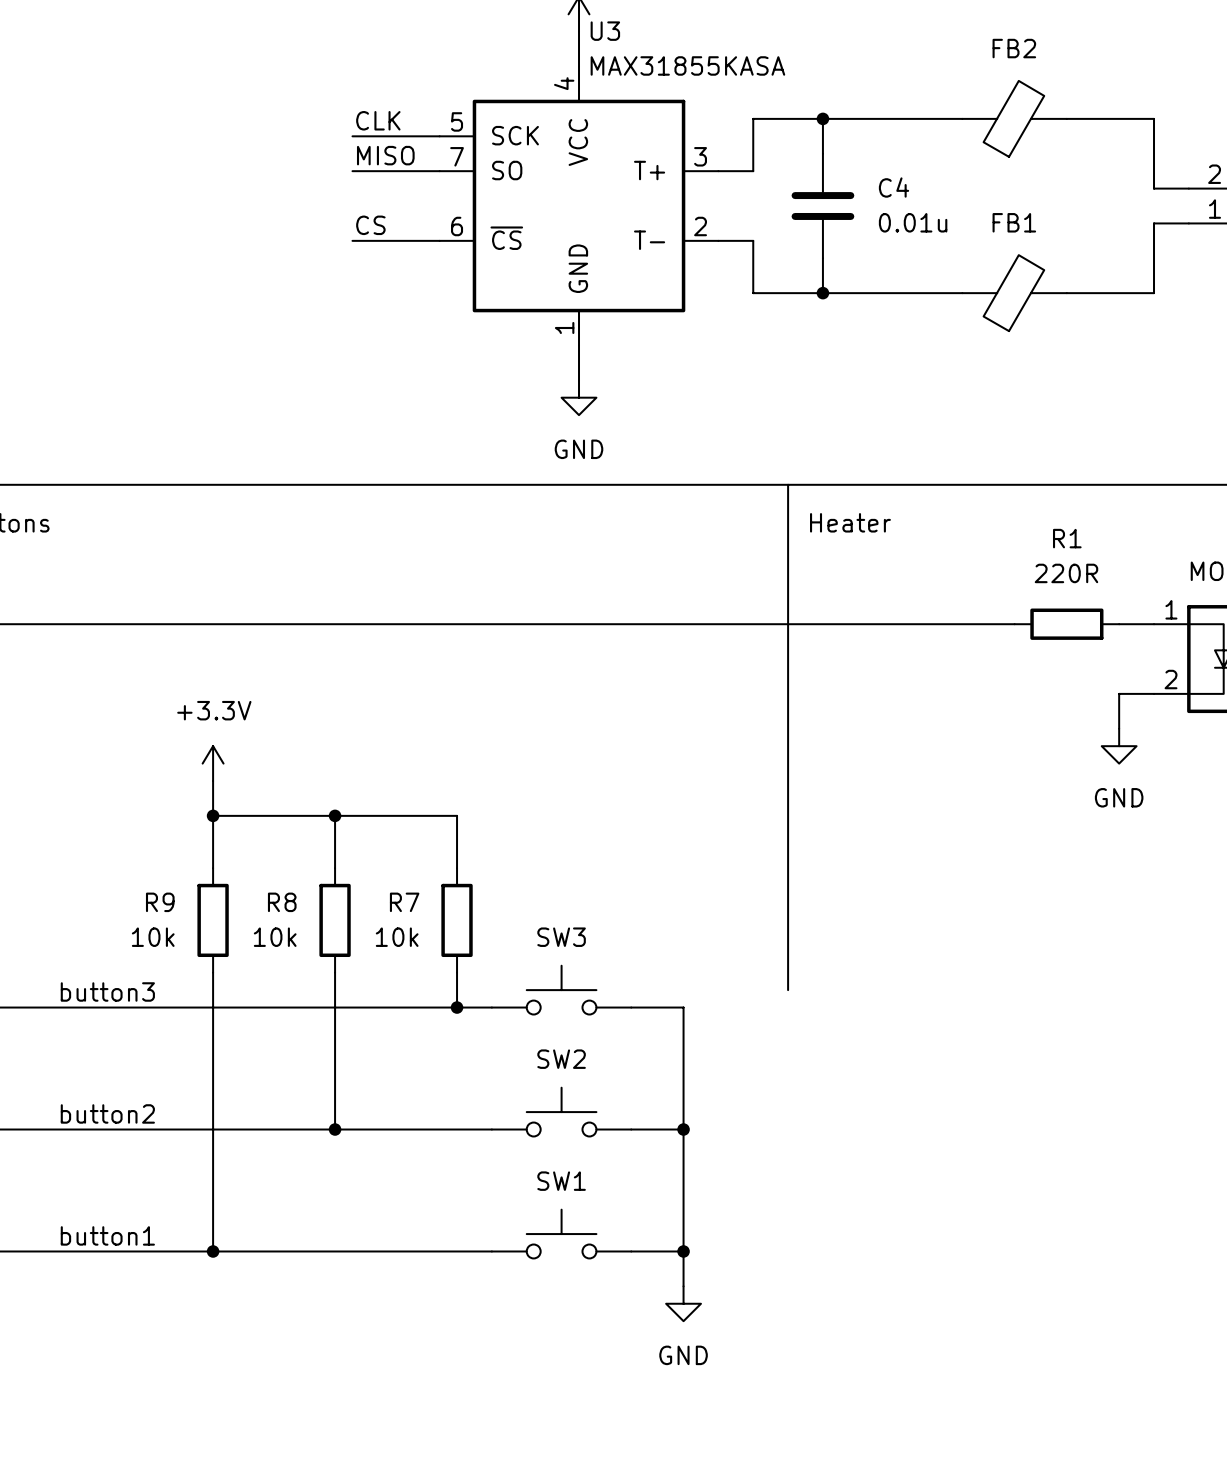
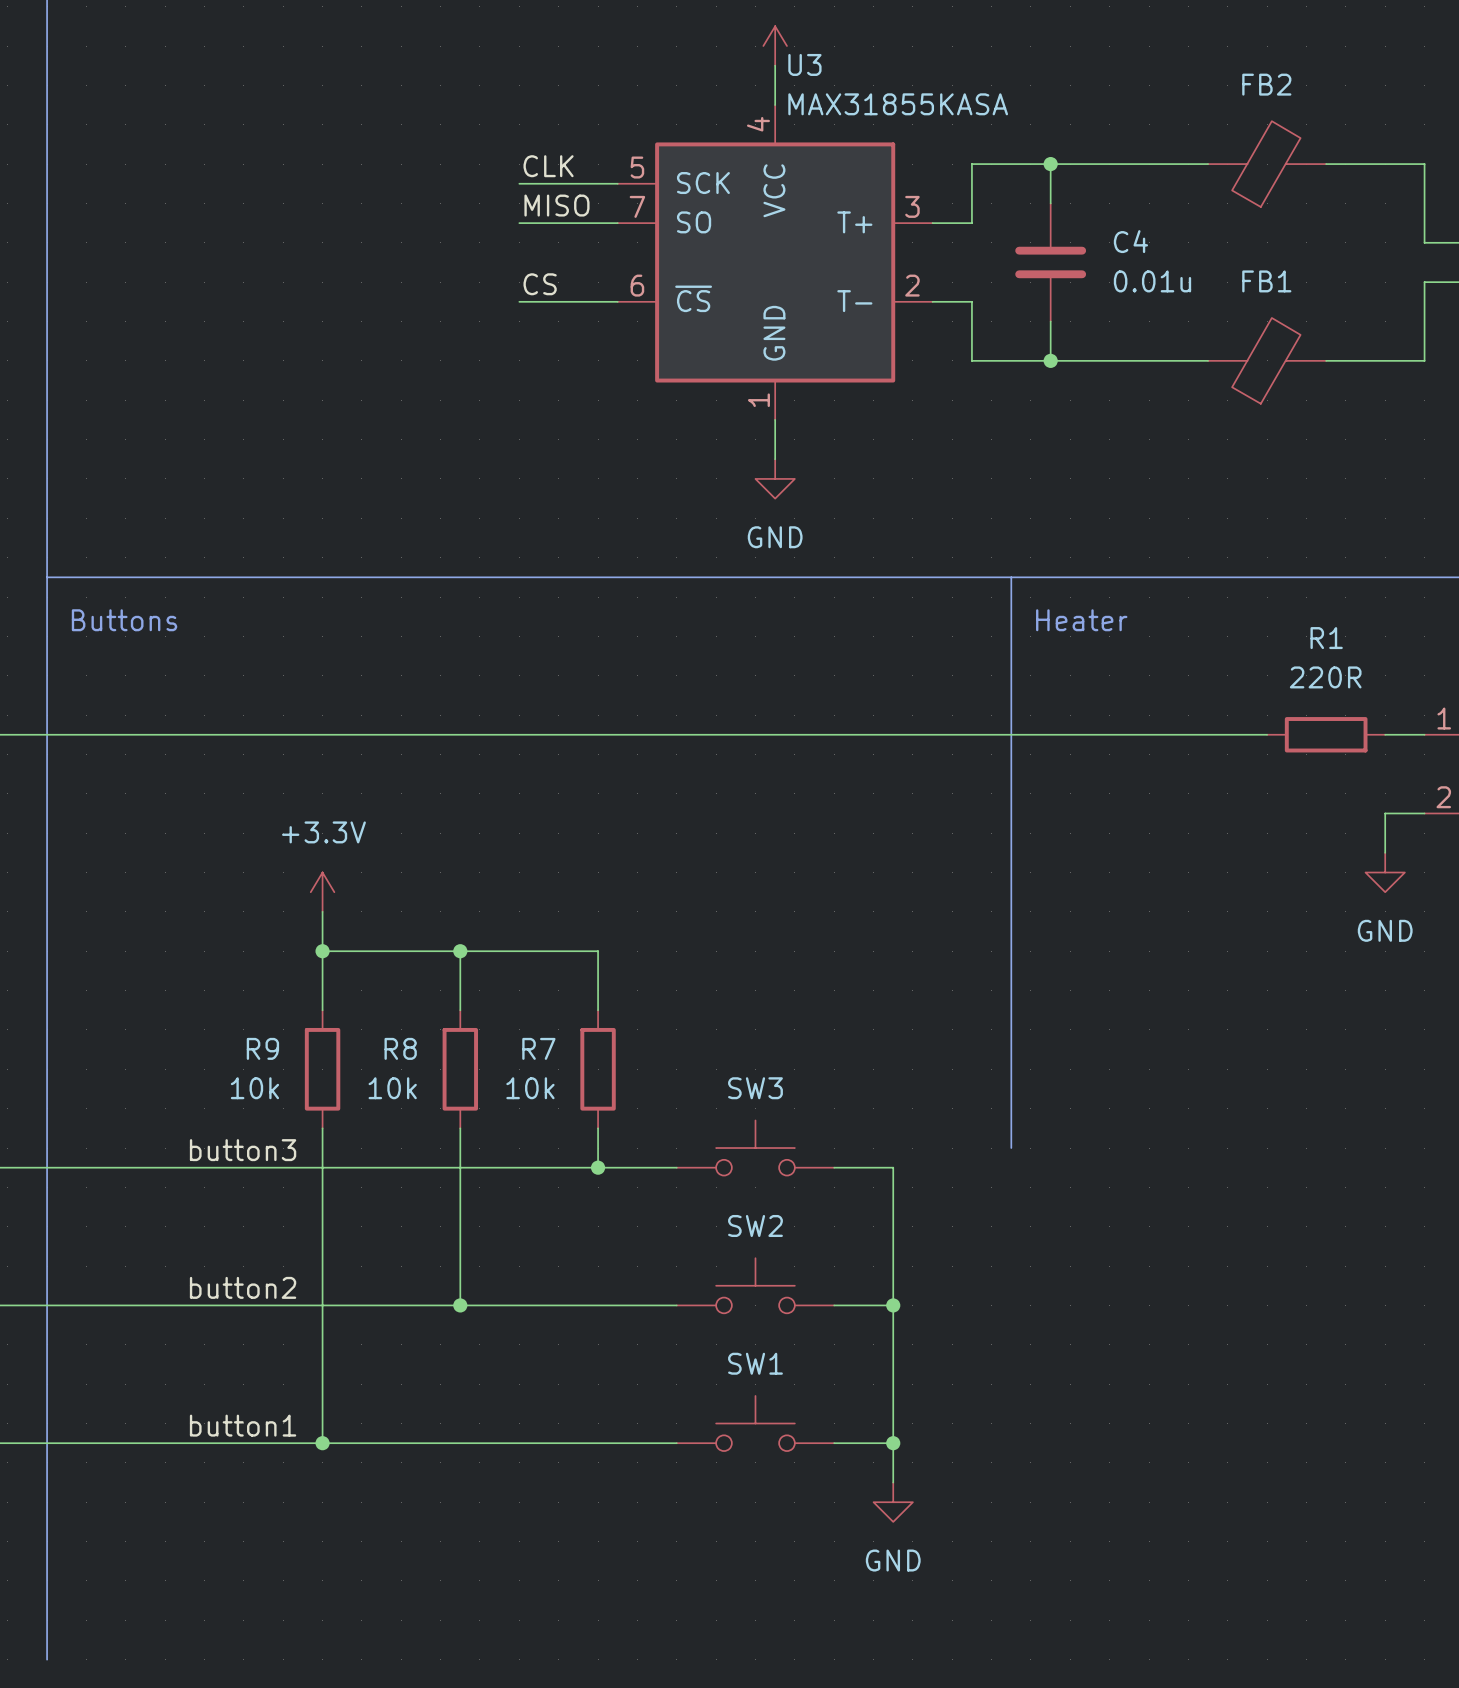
power symbol position: +3.3V (213, 763) -> +3.3V (322, 892)
wire: (213, 781) (213, 868) -> (322, 911) (322, 1010)
wire: none -> (322, 951) (361, 951)
junction position: (213, 815) -> (322, 951)
wire: (335, 815) (335, 868) -> (460, 951) (460, 1010)
junction position: (335, 815) -> (460, 951)
wire: (422, 815) (457, 815) (457, 868) -> (598, 951) (598, 1010)
R9 position: (213, 920) -> (322, 1069)
R8 position: (335, 920) -> (460, 1069)
R7 position: (457, 920) -> (598, 1069)
wire: (213, 972) (213, 1251) -> (322, 1128) (322, 1443)
wire: (335, 972) (335, 1129) -> (460, 1128) (460, 1305)
wire: (457, 972) (457, 1007) -> (598, 1128) (598, 1167)
junction position: (457, 1007) -> (598, 1167)
junction position: (335, 1129) -> (460, 1305)
junction position: (213, 1251) -> (322, 1443)

